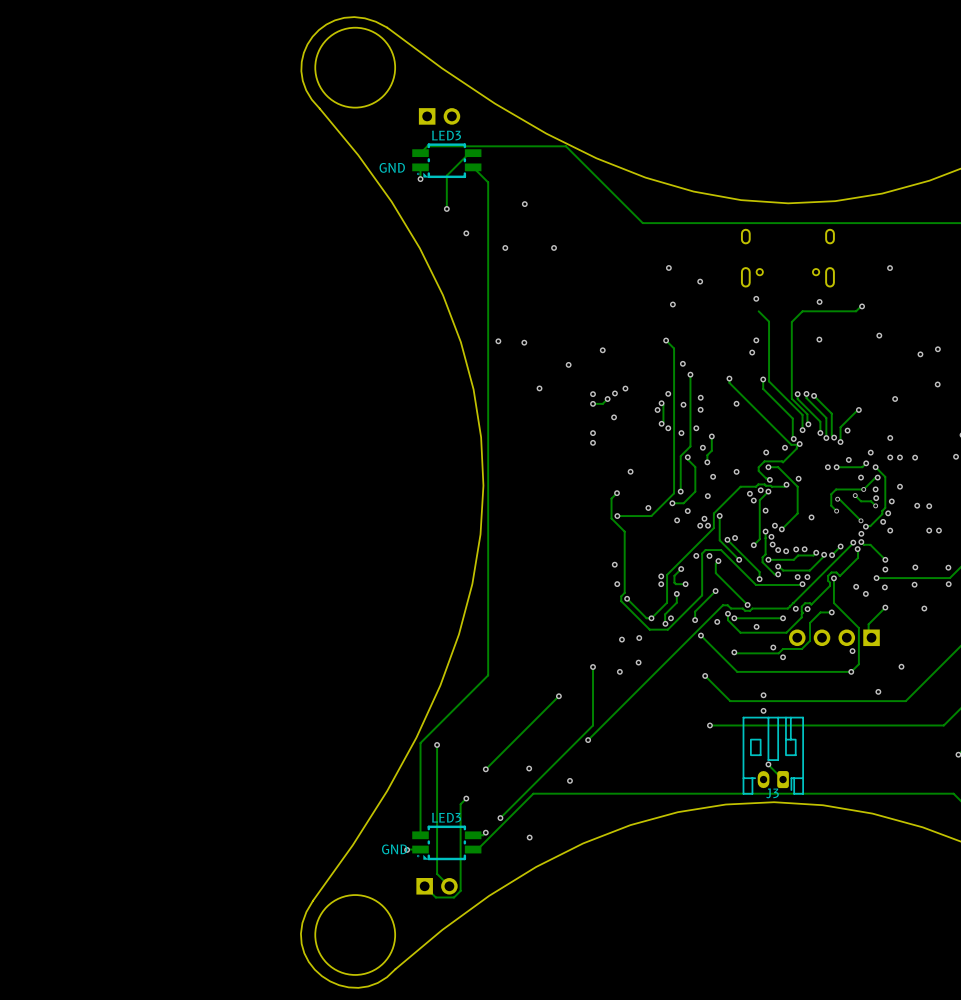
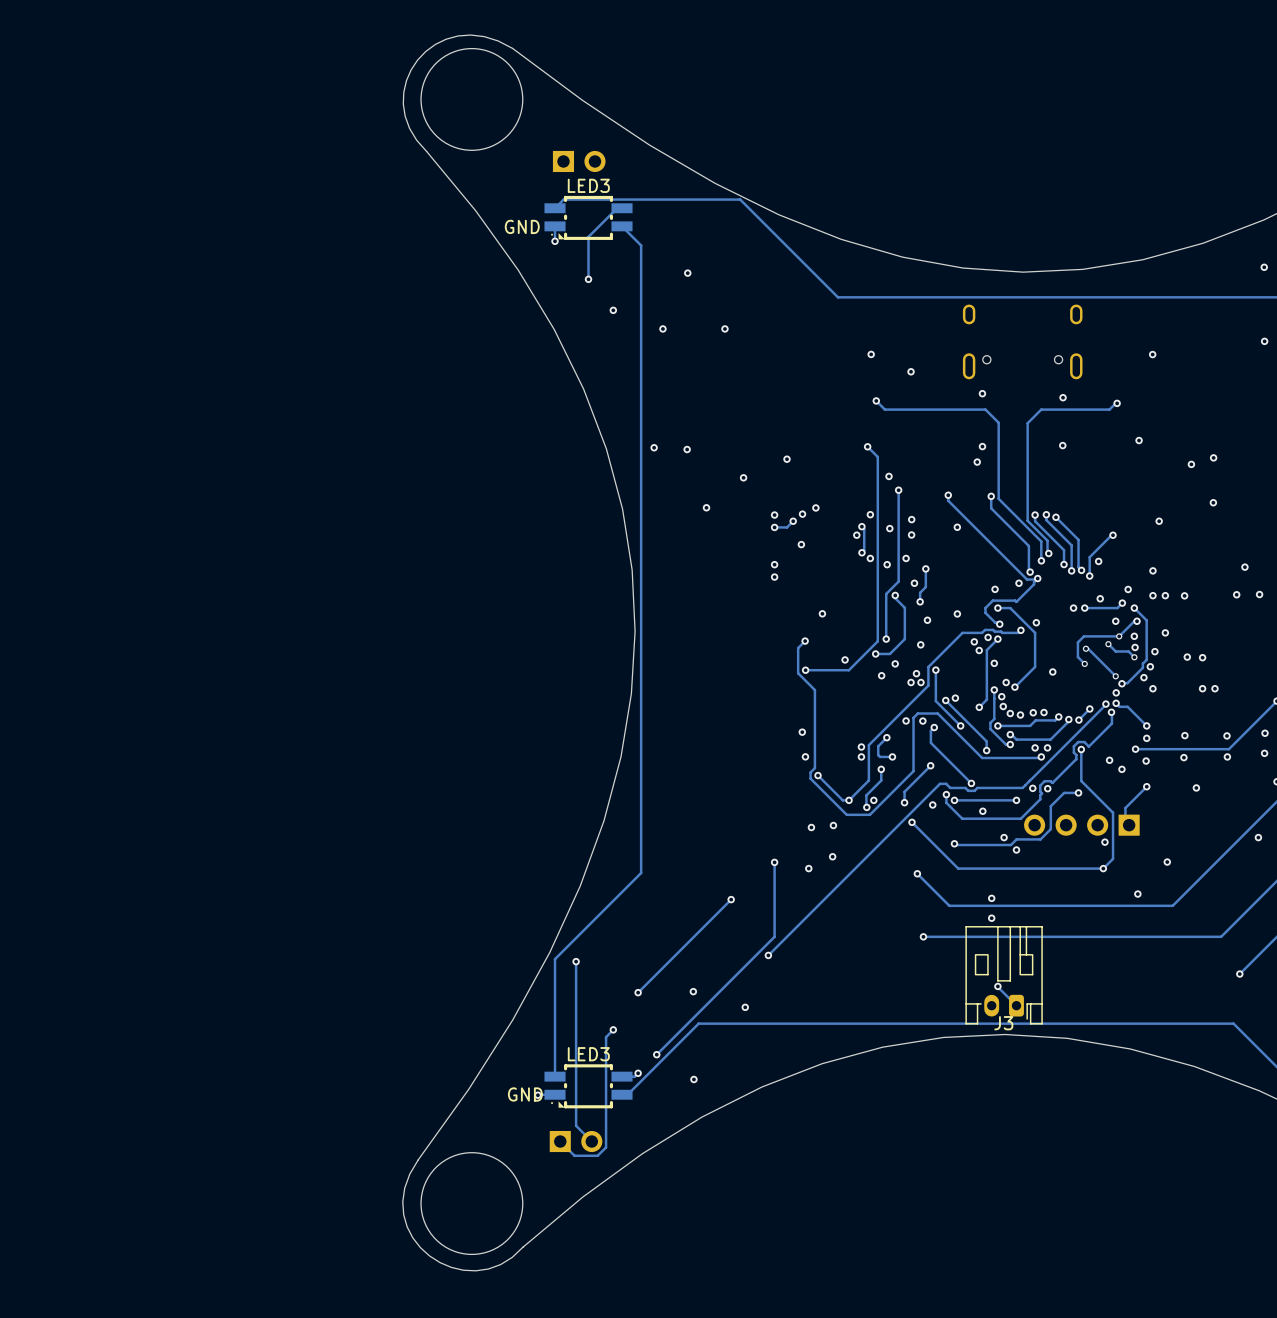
track: none -> (876, 400) (884, 409) (985, 409)

